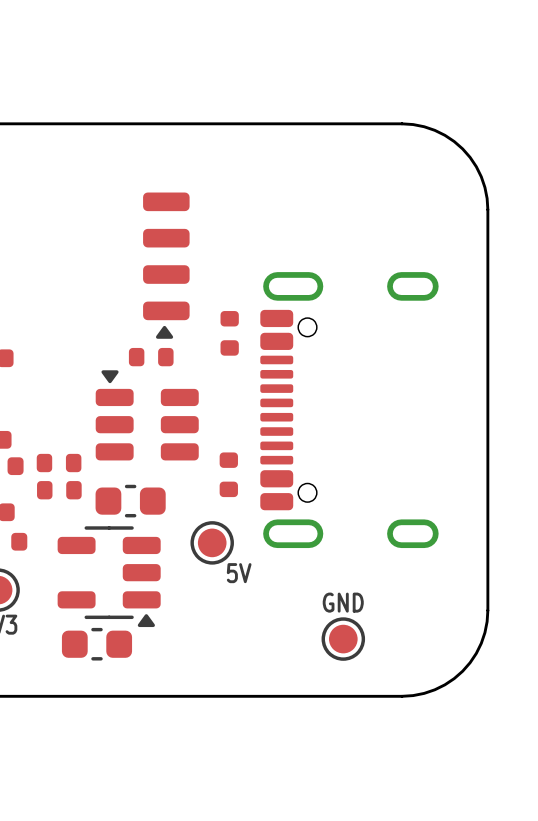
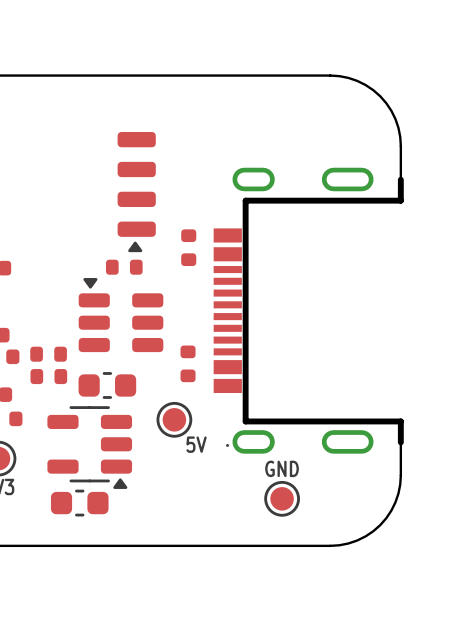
board edge: (487, 250) (487, 570) -> none
part footprint: [260, 272, 439, 549] -> [213, 167, 404, 454]

